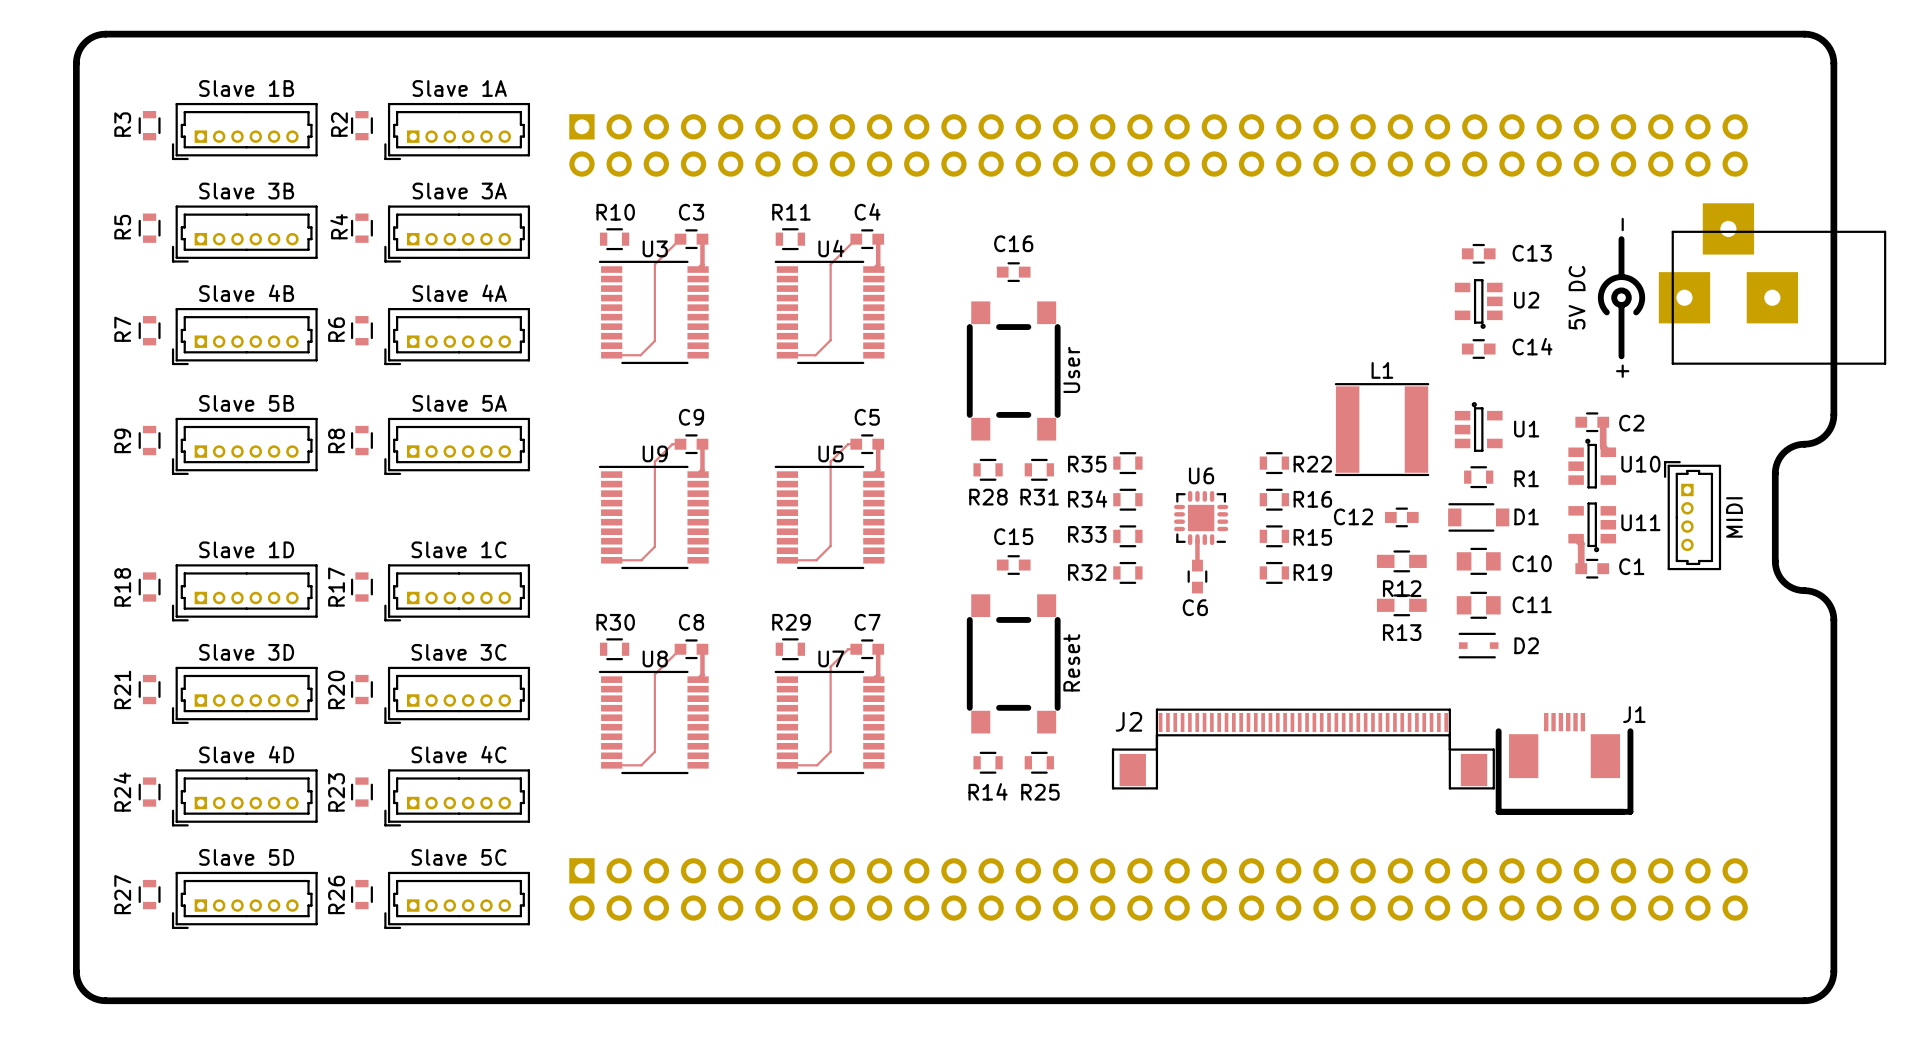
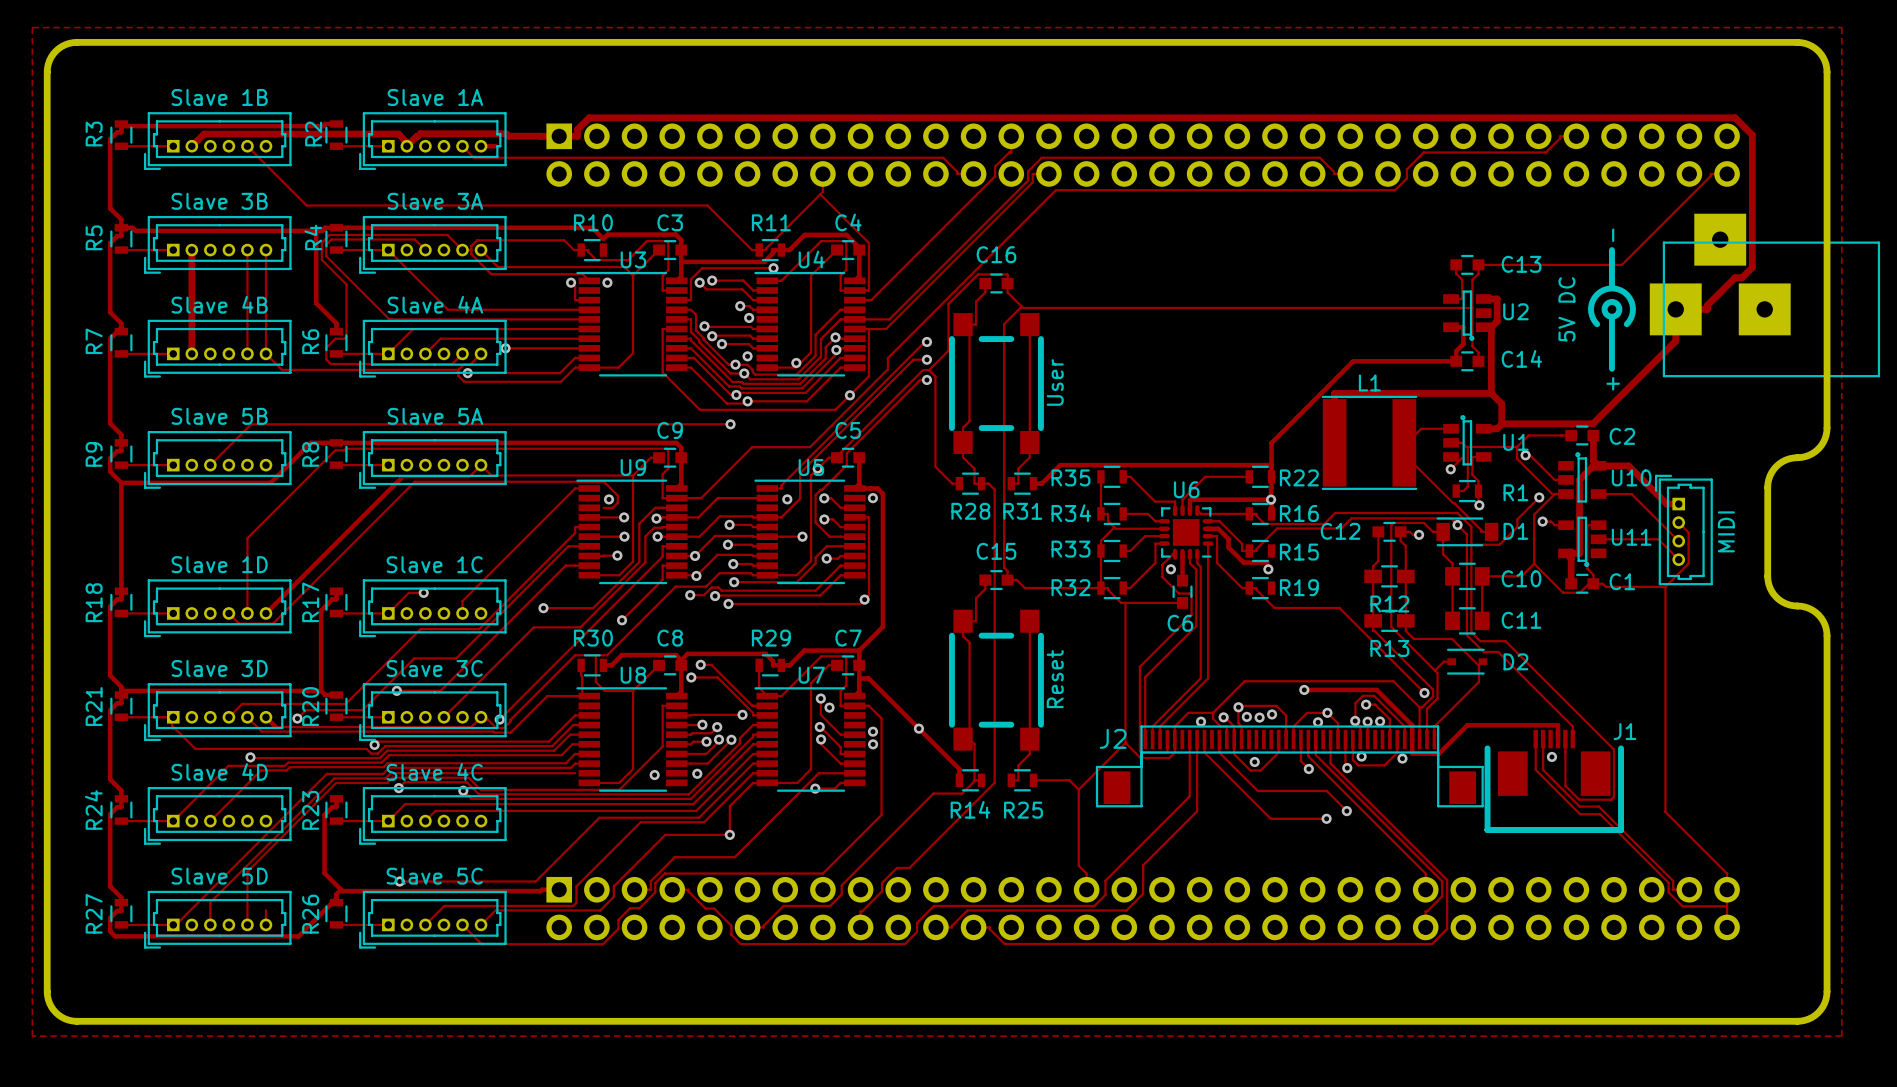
zone outline: none -> (32, 27) (1841, 27) (1841, 1036) (32, 1036) (32, 27)
track: none -> (121, 123) (121, 132) (117, 132) (110, 139) (110, 208) (121, 219) (121, 236) (117, 236) (110, 243) (110, 312) (121, 323) (121, 331)
track: none -> (336, 123) (325, 123) (323, 126) (121, 126)
track: none -> (540, 136) (508, 136) (506, 133) (420, 133) (406, 146)
track: none -> (540, 136) (577, 136) (577, 129) (589, 117) (1735, 117) (1752, 135) (1752, 267) (1742, 277) (1735, 277) (1707, 305) (1707, 309) (1675, 309) (1675, 341) (1592, 423) (1501, 423)
track: none -> (1011, 136) (1011, 152) (995, 166) (995, 176) (871, 300) (854, 300)
track: none -> (1576, 136) (1560, 136) (1545, 152) (1423, 152) (1406, 169) (1406, 178) (1395, 190) (1055, 190) (887, 358) (887, 369) (810, 447) (752, 447) (701, 498) (662, 498) (662, 474) (668, 468) (668, 450) (666, 448) (345, 448) (335, 450) (247, 538) (247, 613)
track: none -> (408, 144) (398, 134) (204, 134) (191, 146)
track: none -> (121, 146) (173, 146)
track: none -> (247, 146) (306, 205) (707, 205) (752, 250) (766, 250) (822, 191) (822, 173)
track: none -> (336, 146) (388, 146)
track: none -> (462, 146) (474, 157) (943, 157) (957, 173) (973, 173)
track: none -> (481, 146) (495, 146)
track: none -> (1048, 173) (1032, 173) (1032, 182) (886, 329) (854, 329)
track: none -> (1350, 173) (1334, 173) (1319, 157) (1041, 157) (1028, 171) (1028, 180) (889, 319) (840, 319) (820, 339) (820, 356) (798, 379) (750, 379) (744, 373) (730, 373) (690, 331) (690, 319) (676, 319)
track: none -> (1727, 173) (1710, 173) (1621, 264) (1478, 264) (1478, 273) (1472, 279) (1472, 346) (1478, 352) (1478, 361)
track: none -> (820, 194) (868, 242) (868, 290) (840, 290) (840, 275) (846, 270) (846, 242) (844, 241) (821, 241) (781, 280) (767, 280)
track: none -> (121, 227) (132, 227) (135, 230) (322, 230) (325, 227) (592, 227) (603, 238) (607, 234) (675, 234) (681, 239) (681, 250)
track: none -> (316, 230) (316, 303) (336, 323) (336, 331)
track: none -> (121, 250) (173, 250)
track: none -> (191, 250) (191, 353)
track: none -> (247, 250) (247, 353)
track: none -> (265, 250) (265, 353) (281, 369) (458, 369)
track: none -> (336, 250) (388, 250) (448, 309) (589, 309)
track: none -> (425, 250) (414, 239) (331, 239) (326, 244) (326, 256) (389, 319) (589, 319)
track: none -> (471, 250) (462, 250) (447, 234) (329, 234) (321, 242) (321, 259) (346, 284) (346, 336) (344, 338) (335, 338) (326, 347) (326, 359) (330, 364) (452, 364) (462, 353)
track: none -> (481, 250) (498, 267) (624, 267) (633, 275)
track: none -> (859, 250) (859, 247) (846, 234) (804, 234) (789, 250) (773, 250) (773, 253) (764, 261) (681, 261)
track: none -> (1456, 264) (1456, 273) (1462, 279) (1462, 299) (1451, 299)
track: none -> (773, 268) (702, 268) (690, 279) (690, 300) (676, 300)
via: none -> (773, 268)
track: none -> (589, 280) (582, 274) (491, 274) (471, 254) (471, 246) (477, 240) (564, 240) (574, 250) (588, 250) (596, 260) (627, 260) (646, 241) (666, 241) (668, 242) (668, 270) (662, 275) (662, 290) (676, 290)
track: none -> (712, 280) (743, 280) (753, 290) (767, 290)
via: none -> (712, 280)
track: none -> (571, 282) (575, 286) (575, 300) (589, 300)
via: none -> (571, 282)
via: none -> (607, 282)
track: none -> (699, 282) (706, 289) (742, 289) (753, 300) (767, 300)
via: none -> (699, 282)
track: none -> (985, 283) (985, 292) (976, 301) (976, 324) (963, 324)
track: none -> (1483, 299) (1497, 299) (1497, 321) (1491, 327)
track: none -> (740, 306) (749, 306) (753, 309) (767, 309)
via: none -> (740, 306)
track: none -> (1021, 306) (1004, 324) (1004, 567) (1007, 571) (1007, 580) (1016, 580) (1024, 588) (1108, 588) (1121, 602) (1182, 602)
track: none -> (1472, 307) (1023, 307) (1007, 292) (1007, 274) (977, 274) (948, 303) (948, 350) (929, 370)
track: none -> (676, 309) (690, 309) (696, 314) (696, 330) (728, 364) (735, 364)
track: none -> (854, 309) (840, 309) (815, 334) (815, 355) (796, 374) (755, 374) (747, 364) (735, 364)
via: none -> (749, 317)
track: none -> (969, 324) (969, 421) (963, 427) (963, 457) (974, 468) (974, 483) (988, 483) (994, 489) (994, 782) (909, 868) (896, 868) (882, 882) (882, 891) (860, 911) (860, 927)
track: none -> (1029, 324) (1029, 457) (1018, 468) (1018, 483) (1011, 483)
track: none -> (704, 326) (767, 329)
via: none -> (704, 326)
track: none -> (121, 327) (110, 338) (110, 423) (121, 434) (121, 451) (117, 451) (110, 458) (110, 471) (121, 482)
track: none -> (1451, 327) (1463, 327) (1463, 344) (1456, 351) (1456, 361) (1353, 361) (1271, 442) (1271, 513)
track: none -> (1491, 327) (1491, 393)
track: none -> (589, 329) (413, 329) (388, 353) (336, 353)
track: none -> (676, 329) (662, 329) (662, 372) (699, 409) (835, 409) (868, 376) (868, 329)
track: none -> (712, 336) (750, 335) (753, 338) (767, 338)
via: none -> (712, 336)
via: none -> (835, 337)
track: none -> (589, 338) (440, 338) (425, 353)
track: none -> (676, 338) (690, 338) (732, 381) (741, 381) (743, 383) (800, 383) (825, 358) (825, 347) (835, 337) (854, 338)
track: none -> (926, 342) (781, 485) (781, 488) (767, 488)
via: none -> (926, 342)
track: none -> (721, 344) (748, 344) (753, 348) (767, 348)
via: none -> (721, 344)
track: none -> (505, 348) (589, 348)
via: none -> (505, 348)
track: none -> (676, 348) (690, 348) (729, 386) (739, 386) (741, 388) (802, 388) (836, 354) (836, 349) (854, 348)
via: none -> (836, 349)
track: none -> (121, 353) (173, 353)
track: none -> (481, 353) (470, 364) (463, 364) (458, 369)
via: none -> (747, 356)
track: none -> (589, 357) (575, 357) (559, 373) (467, 373)
track: none -> (676, 357) (693, 357) (730, 394) (738, 392) (805, 392) (840, 357) (854, 357)
track: none -> (926, 359) (913, 359) (800, 473) (800, 498) (781, 517) (719, 516) (699, 536) (657, 536)
via: none -> (926, 359)
via: none -> (796, 363)
via: none -> (735, 364)
track: none -> (589, 367) (575, 367) (560, 381) (464, 381) (458, 375) (458, 369)
track: none -> (676, 367) (690, 367) (726, 403) (745, 403) (747, 401) (806, 401) (840, 367) (854, 367)
track: none -> (929, 370) (935, 376) (935, 466) (952, 483) (959, 483)
track: none -> (929, 370) (922, 370) (836, 457)
via: none -> (467, 373)
via: none -> (744, 373)
track: none -> (926, 379) (920, 379) (846, 453) (846, 465) (815, 494) (815, 522) (829, 536) (854, 536)
via: none -> (926, 379)
track: none -> (1491, 393) (1334, 393) (1334, 442)
track: none -> (1491, 393) (1501, 403) (1501, 424) (1497, 428) (1483, 428)
via: none -> (736, 394)
via: none -> (849, 395)
via: none -> (747, 401)
track: none -> (730, 424) (251, 424) (210, 465)
via: none -> (730, 424)
track: none -> (1451, 428) (1421, 428) (1407, 442)
track: none -> (1571, 435) (1528, 435) (1517, 446)
track: none -> (1407, 442) (1407, 457) (1481, 531) (1491, 531)
track: none -> (1451, 442) (1462, 442) (1466, 446) (1517, 446)
track: none -> (1467, 446) (1467, 486) (1463, 491) (1456, 491)
track: none -> (1517, 446) (1517, 458) (1552, 494) (1565, 494)
track: none -> (1525, 455) (1530, 455) (1554, 479) (1565, 479)
via: none -> (1525, 455)
track: none -> (1483, 456) (1472, 456) (1472, 474) (1478, 481) (1479, 505)
track: (672, 444) (654, 461) -> (650, 457) (633, 475) (491, 475) (481, 465) (468, 477) (402, 477) (265, 613)
track: none -> (681, 457) (681, 447) (676, 442) (310, 442) (270, 482) (121, 482)
track: none -> (1462, 457) (1450, 469)
track: none -> (1596, 463) (1579, 479) (1579, 553) (1565, 553)
track: none -> (121, 465) (173, 465)
track: none -> (336, 465) (388, 465)
track: none -> (1271, 465) (1060, 465) (1041, 483) (1033, 483)
track: none -> (1598, 465) (1628, 465) (1666, 504) (1678, 504)
via: none -> (817, 468)
via: none -> (1450, 469)
track: none -> (1100, 476) (1100, 513) (1108, 513) (1108, 521) (1115, 528) (1164, 528)
track: none -> (1123, 476) (1130, 476) (1155, 501) (1175, 501) (1175, 510)
track: none -> (1249, 476) (1205, 476) (1182, 499) (1182, 510)
track: none -> (121, 482) (121, 599) (117, 599) (110, 606) (110, 675) (121, 686) (121, 703) (117, 703) (110, 710) (110, 779) (121, 790) (121, 807) (117, 807) (110, 814) (110, 886) (121, 897) (121, 910) (117, 910) (110, 917) (110, 931) (115, 936) (298, 936) (336, 898)
track: none -> (589, 488) (575, 488) (462, 601) (462, 613)
track: none -> (854, 488) (877, 488) (882, 493) (882, 626) (859, 650)
track: none -> (1554, 494) (1534, 514) (1534, 563)
track: none -> (1598, 494) (1631, 494) (1678, 541)
track: none -> (1539, 497) (1517, 519) (1517, 527) (1499, 544) (1471, 544)
via: none -> (1539, 497)
track: none -> (767, 498) (717, 498) (698, 517) (656, 518)
track: none -> (824, 498) (831, 498) (840, 507) (854, 507)
via: none -> (824, 498)
via: none -> (872, 498)
via: none -> (609, 499)
via: none -> (787, 499)
track: none -> (1271, 499) (1190, 499) (1189, 510)
via: none -> (1271, 499)
via: none -> (1479, 505)
track: none -> (603, 507) (612, 507) (617, 502) (617, 495) (604, 481) (414, 481) (272, 623) (239, 623) (228, 613)
track: none -> (676, 507) (655, 507) (639, 523) (639, 562) (593, 608) (543, 608)
track: none -> (1197, 510) (1200, 513) (1256, 513) (1264, 523) (1324, 523) (1335, 512) (1457, 512) (1471, 526) (1471, 632) (1480, 641) (1505, 641) (1613, 749) (1613, 797) (1611, 799) (1579, 799) (1565, 785) (1565, 739)
track: none -> (1123, 513) (1148, 513) (1155, 521) (1164, 521)
track: none -> (589, 517) (624, 517)
via: none -> (624, 517)
track: none -> (854, 517) (868, 517) (868, 595) (860, 603) (728, 603)
via: none -> (656, 518)
track: none -> (824, 519) (833, 519) (840, 527) (854, 527)
via: none -> (824, 519)
track: none -> (1208, 521) (1219, 521) (1242, 543) (1242, 550) (1256, 550) (1277, 528) (1341, 528) (1351, 518) (1450, 518) (1466, 534) (1466, 635) (1483, 651) (1498, 651) (1572, 726) (1572, 739)
track: none -> (1542, 521) (1551, 521) (1554, 525) (1565, 525)
via: none -> (1542, 521)
track: none -> (1678, 522) (1688, 532) (1688, 563) (1665, 586)
track: none -> (729, 524) (767, 527)
via: none -> (729, 524)
via: none -> (1457, 525)
track: none -> (1598, 525) (1587, 525) (1587, 568) (1593, 574) (1593, 583) (1602, 583) (1605, 586) (1665, 586)
track: none -> (589, 527) (575, 527) (575, 533) (479, 629) (420, 629) (345, 703) (242, 703) (228, 717)
track: none -> (676, 527) (654, 527) (645, 536) (645, 562) (580, 627) (533, 627) (443, 717)
track: none -> (1114, 527) (1100, 540) (1100, 588)
track: none -> (1208, 528) (1218, 528) (1228, 539) (1228, 547) (1243, 562) (1267, 562)
track: none -> (1378, 531) (1378, 561) (1373, 566) (1373, 630) (1433, 689) (1433, 696) (1422, 707) (1419, 707)
track: none -> (1419, 534) (1412, 534) (1409, 531) (1400, 531) (1400, 540) (1405, 546) (1405, 630) (1413, 638) (1452, 638) (1478, 665) (1478, 681) (1434, 726) (1434, 739)
via: none -> (1419, 534)
track: none -> (1164, 536) (1145, 536) (1130, 550) (1123, 550)
track: none -> (1208, 536) (1217, 536) (1217, 562) (1242, 588) (1256, 588) (1274, 607) (1339, 607) (1424, 693)
track: none -> (589, 536) (624, 536)
via: none -> (624, 536)
via: none -> (657, 536)
track: none -> (802, 536) (715, 535) (695, 555) (676, 555)
via: none -> (802, 536)
track: none -> (1598, 539) (1658, 539) (1678, 559)
track: none -> (1164, 543) (1155, 543) (1155, 562) (1130, 588) (1123, 588)
track: none -> (1208, 543) (1208, 678) (1160, 726) (1160, 739)
track: none -> (727, 544) (767, 546)
via: none -> (727, 544)
track: none -> (589, 546) (568, 546) (456, 658) (414, 658) (362, 710) (305, 710) (297, 718)
track: none -> (676, 546) (662, 546) (662, 556) (499, 719)
track: none -> (854, 546) (826, 546) (815, 557) (815, 563) (796, 582) (734, 582)
track: none -> (1175, 554) (1162, 564) (1162, 576) (1178, 593) (1189, 593) (1191, 595) (1191, 615) (1139, 666) (1139, 750) (1141, 752) (1167, 752) (1167, 739)
track: none -> (1189, 554) (1189, 563) (1196, 569) (1196, 626) (1145, 677) (1145, 739)
track: none -> (1197, 554) (1197, 563) (1200, 566) (1200, 678) (1152, 726) (1152, 739)
track: none -> (617, 555) (589, 555)
via: none -> (617, 555)
via: none -> (695, 555)
track: none -> (767, 555) (717, 554) (696, 575) (676, 575)
track: none -> (854, 555) (826, 558)
via: none -> (826, 558)
track: none -> (1534, 563) (1521, 576) (1482, 576) (1482, 620)
track: none -> (1534, 563) (1563, 592) (1579, 592) (1593, 579)
track: none -> (733, 564) (767, 565)
via: none -> (733, 564)
track: none -> (589, 565) (565, 565) (440, 690) (396, 690)
track: none -> (676, 565) (662, 565) (662, 579) (622, 620)
track: none -> (854, 565) (840, 565) (815, 590) (721, 590) (718, 587) (711, 587) (703, 595) (690, 595)
via: none -> (1170, 569)
via: none -> (1268, 569)
via: none -> (696, 575)
track: none -> (767, 575) (719, 573) (706, 586) (675, 586) (607, 655) (575, 655) (503, 728) (496, 728) (485, 717) (481, 717) (471, 727) (275, 727) (265, 717)
track: none -> (854, 575) (840, 575) (820, 595) (715, 596)
track: none -> (985, 580) (985, 589) (976, 598) (976, 621) (963, 621) (963, 636) (969, 642) (969, 739)
via: none -> (734, 582)
track: none -> (1665, 586) (1665, 811) (1727, 873) (1727, 927)
track: none -> (336, 591) (336, 599) (332, 599) (321, 610) (321, 690)
track: none -> (423, 592) (408, 592) (388, 613) (336, 613)
via: none -> (423, 592)
via: none -> (690, 595)
via: none -> (715, 596)
via: none -> (864, 599)
track: none -> (1125, 602) (1125, 742)
via: none -> (728, 603)
via: none -> (543, 608)
track: none -> (121, 613) (173, 613)
via: none -> (622, 620)
track: none -> (1029, 621) (1029, 754) (1018, 765) (1018, 780) (1011, 780)
track: none -> (1452, 620) (1452, 563) (1443, 554) (1443, 531) (1432, 531) (1424, 522) (1393, 522) (1391, 524) (1391, 626) (1435, 670)
track: none -> (859, 650) (859, 665)
track: none -> (859, 650) (804, 650) (789, 665) (773, 665) (773, 661) (765, 653) (687, 653) (681, 660) (676, 655) (621, 655) (611, 665) (603, 665)
track: none -> (595, 655) (595, 682) (604, 690) (633, 690)
track: none -> (1451, 661) (1443, 661) (1435, 670)
track: none -> (700, 664) (711, 664) (752, 705) (767, 705)
via: none -> (700, 664)
track: none -> (581, 665) (582, 696)
track: none -> (759, 665) (759, 687) (767, 696)
track: none -> (1435, 670) (1437, 673) (1437, 698) (1427, 708) (1427, 739)
track: none -> (691, 677) (717, 677) (753, 713) (753, 715) (767, 715)
via: none -> (691, 677)
track: none -> (859, 678) (868, 678) (959, 769) (959, 780)
track: none -> (1304, 689) (1376, 689) (1412, 725) (1412, 753) (1439, 753) (1467, 725) (1557, 725) (1557, 739)
via: none -> (1304, 689)
track: none -> (121, 690) (321, 690)
track: none -> (321, 690) (325, 695) (336, 695)
via: none -> (396, 690)
via: none -> (1424, 693)
track: none -> (589, 696) (547, 696) (510, 732) (261, 731) (247, 717)
track: none -> (767, 696) (781, 696) (821, 656) (844, 656) (846, 658) (846, 685) (840, 691) (840, 705) (868, 705) (881, 718) (881, 814) (822, 873) (664, 873) (655, 883) (655, 892) (639, 908) (630, 908) (618, 920) (618, 928) (603, 944) (481, 944) (462, 924)
track: none -> (820, 698) (820, 714) (840, 734) (854, 734)
via: none -> (820, 698)
track: none -> (1366, 704) (1375, 704) (1389, 719) (1389, 739)
via: none -> (1366, 704)
track: none -> (676, 705) (662, 705) (662, 746) (619, 789) (480, 789) (468, 777) (392, 777) (387, 782) (336, 782) (247, 871) (247, 924)
via: none -> (829, 707)
via: none -> (1238, 707)
track: none -> (1419, 707) (1419, 739)
track: none -> (1419, 707) (1393, 681) (1244, 681) (1213, 712)
track: none -> (1213, 712) (1188, 712) (1174, 726) (1174, 752) (1169, 758) (1140, 758) (1125, 742)
track: none -> (1213, 712) (1213, 718) (1220, 726) (1226, 726) (1226, 739)
via: none -> (1327, 712)
via: none -> (1272, 714)
track: none -> (589, 715) (575, 715) (548, 741) (377, 741) (374, 744)
track: none -> (742, 714) (676, 715)
via: none -> (742, 714)
track: none -> (121, 717) (173, 717)
track: none -> (172, 717) (172, 725) (195, 748) (366, 748) (371, 753) (378, 753) (385, 746) (552, 746) (573, 725) (589, 725)
track: none -> (336, 717) (388, 717)
track: none -> (1223, 717) (1234, 726) (1234, 754) (1250, 770) (1260, 770) (1278, 752) (1278, 739)
via: none -> (1223, 717)
via: none -> (1246, 716)
via: none -> (1259, 717)
via: none -> (297, 718)
via: none -> (499, 719)
via: none -> (1201, 721)
via: none -> (1355, 720)
via: none -> (1367, 721)
via: none -> (1380, 721)
via: none -> (1318, 722)
track: none -> (702, 724) (676, 725)
via: none -> (702, 724)
track: none -> (767, 725) (753, 725) (739, 738) (739, 743) (688, 794) (478, 794) (466, 782) (404, 782) (398, 788)
track: none -> (717, 727) (711, 733) (676, 734)
via: none -> (717, 727)
track: none -> (819, 727) (840, 747) (840, 753) (854, 753)
via: none -> (819, 727)
via: none -> (918, 728)
via: none -> (872, 731)
track: none -> (589, 734) (570, 734) (554, 750) (387, 750) (379, 758) (250, 757)
track: none -> (767, 734) (753, 734) (690, 798) (471, 798) (463, 790)
track: none -> (718, 739) (706, 753) (676, 753)
via: none -> (718, 739)
track: none -> (731, 739) (707, 763) (676, 763)
via: none -> (731, 739)
track: none -> (821, 739) (821, 744) (840, 763) (854, 763)
via: none -> (821, 739)
track: none -> (969, 739) (974, 744) (974, 780) (981, 780)
track: none -> (1189, 739) (1189, 796) (1105, 880) (1105, 894) (1094, 905) (934, 905) (917, 922) (917, 931) (904, 944) (740, 944) (731, 934) (731, 925) (714, 908) (705, 908) (688, 889) (672, 889)
track: none -> (1197, 739) (1197, 811) (1143, 865) (1143, 893) (1126, 910) (967, 910) (952, 927) (935, 927)
track: none -> (1204, 739) (1204, 752) (1270, 818) (1326, 818)
track: none -> (1219, 739) (1219, 752) (1257, 790) (1326, 790) (1346, 811)
track: none -> (1241, 739) (1241, 726) (1238, 723) (1239, 705) (1276, 705) (1286, 715) (1286, 739)
track: none -> (1293, 739) (1293, 726) (1307, 712) (1327, 712) (1338, 723) (1338, 739)
track: none -> (1300, 739) (1300, 761) (1308, 768)
track: none -> (1308, 739) (1308, 756) (1425, 873) (1425, 889)
track: none -> (1315, 739) (1315, 754) (1442, 881) (1442, 896) (1425, 911) (1425, 927)
track: none -> (1330, 739) (1330, 763) (1447, 879) (1447, 928) (1432, 943) (1004, 943) (989, 927) (973, 927)
track: none -> (1345, 739) (1345, 766) (1347, 768)
track: none -> (1352, 739) (1352, 759) (1358, 765) (1384, 765) (1397, 752) (1397, 739)
track: none -> (1360, 739) (1360, 726) (1355, 721) (1355, 703) (1362, 695) (1374, 695) (1404, 726) (1404, 739)
track: none -> (1535, 739) (1535, 769) (1580, 814) (1600, 814) (1668, 882) (1668, 892) (1682, 906) (1727, 906)
track: none -> (1543, 739) (1543, 769) (1579, 806) (1598, 806) (1673, 880) (1673, 889) (1689, 889)
track: none -> (706, 741) (676, 744)
via: none -> (706, 741)
track: none -> (1125, 742) (1078, 789)
via: none -> (374, 744)
track: none -> (589, 744) (572, 744) (561, 755) (389, 755) (381, 762) (288, 762) (284, 765) (228, 765) (173, 821) (121, 821)
track: none -> (767, 744) (753, 744) (693, 804) (405, 804) (388, 821) (336, 821)
via: none -> (873, 744)
track: none -> (589, 753) (575, 753) (565, 763) (387, 763) (383, 767) (290, 767) (286, 770) (261, 770) (210, 821)
track: none -> (767, 753) (753, 753) (696, 810) (435, 810) (425, 821)
via: none -> (1361, 756)
via: none -> (1551, 756)
via: none -> (250, 757)
via: none -> (1402, 758)
via: none -> (1254, 761)
track: none -> (589, 763) (575, 763) (570, 767) (389, 767) (383, 773) (326, 773) (175, 924) (121, 924)
track: none -> (767, 763) (753, 763) (699, 817) (599, 817) (535, 881) (399, 881)
via: none -> (1347, 768)
via: none -> (1308, 768)
track: none -> (575, 773) (390, 773) (385, 778) (334, 778) (210, 902) (210, 924)
track: none -> (767, 773) (753, 773) (704, 822) (640, 822) (576, 886) (576, 902) (573, 905) (444, 905) (425, 924)
track: none -> (854, 773) (818, 773) (734, 857) (674, 857) (650, 881) (650, 889) (634, 889)
via: none -> (697, 773)
via: none -> (654, 775)
track: none -> (975, 780) (962, 793) (933, 793) (841, 885) (841, 894) (830, 905) (783, 905) (763, 927) (747, 927)
track: none -> (1033, 780) (1069, 780) (1078, 789)
track: none -> (767, 782) (753, 782) (729, 806) (729, 834) (665, 834) (613, 886) (613, 896) (600, 910) (495, 910) (481, 924)
track: none -> (854, 782) (840, 782) (834, 788) (815, 788)
via: none -> (398, 788)
via: none -> (815, 788)
track: none -> (1078, 789) (1078, 865) (1086, 873) (1086, 889)
via: none -> (463, 790)
track: none -> (336, 798) (336, 807) (332, 807) (324, 814) (324, 873) (342, 891) (559, 889)
via: none -> (1346, 811)
via: none -> (1326, 818)
via: none -> (729, 834)
via: none -> (399, 881)
track: none -> (341, 889) (336, 894) (336, 902)
track: none -> (265, 910) (265, 924)
track: none -> (336, 924) (388, 924)

